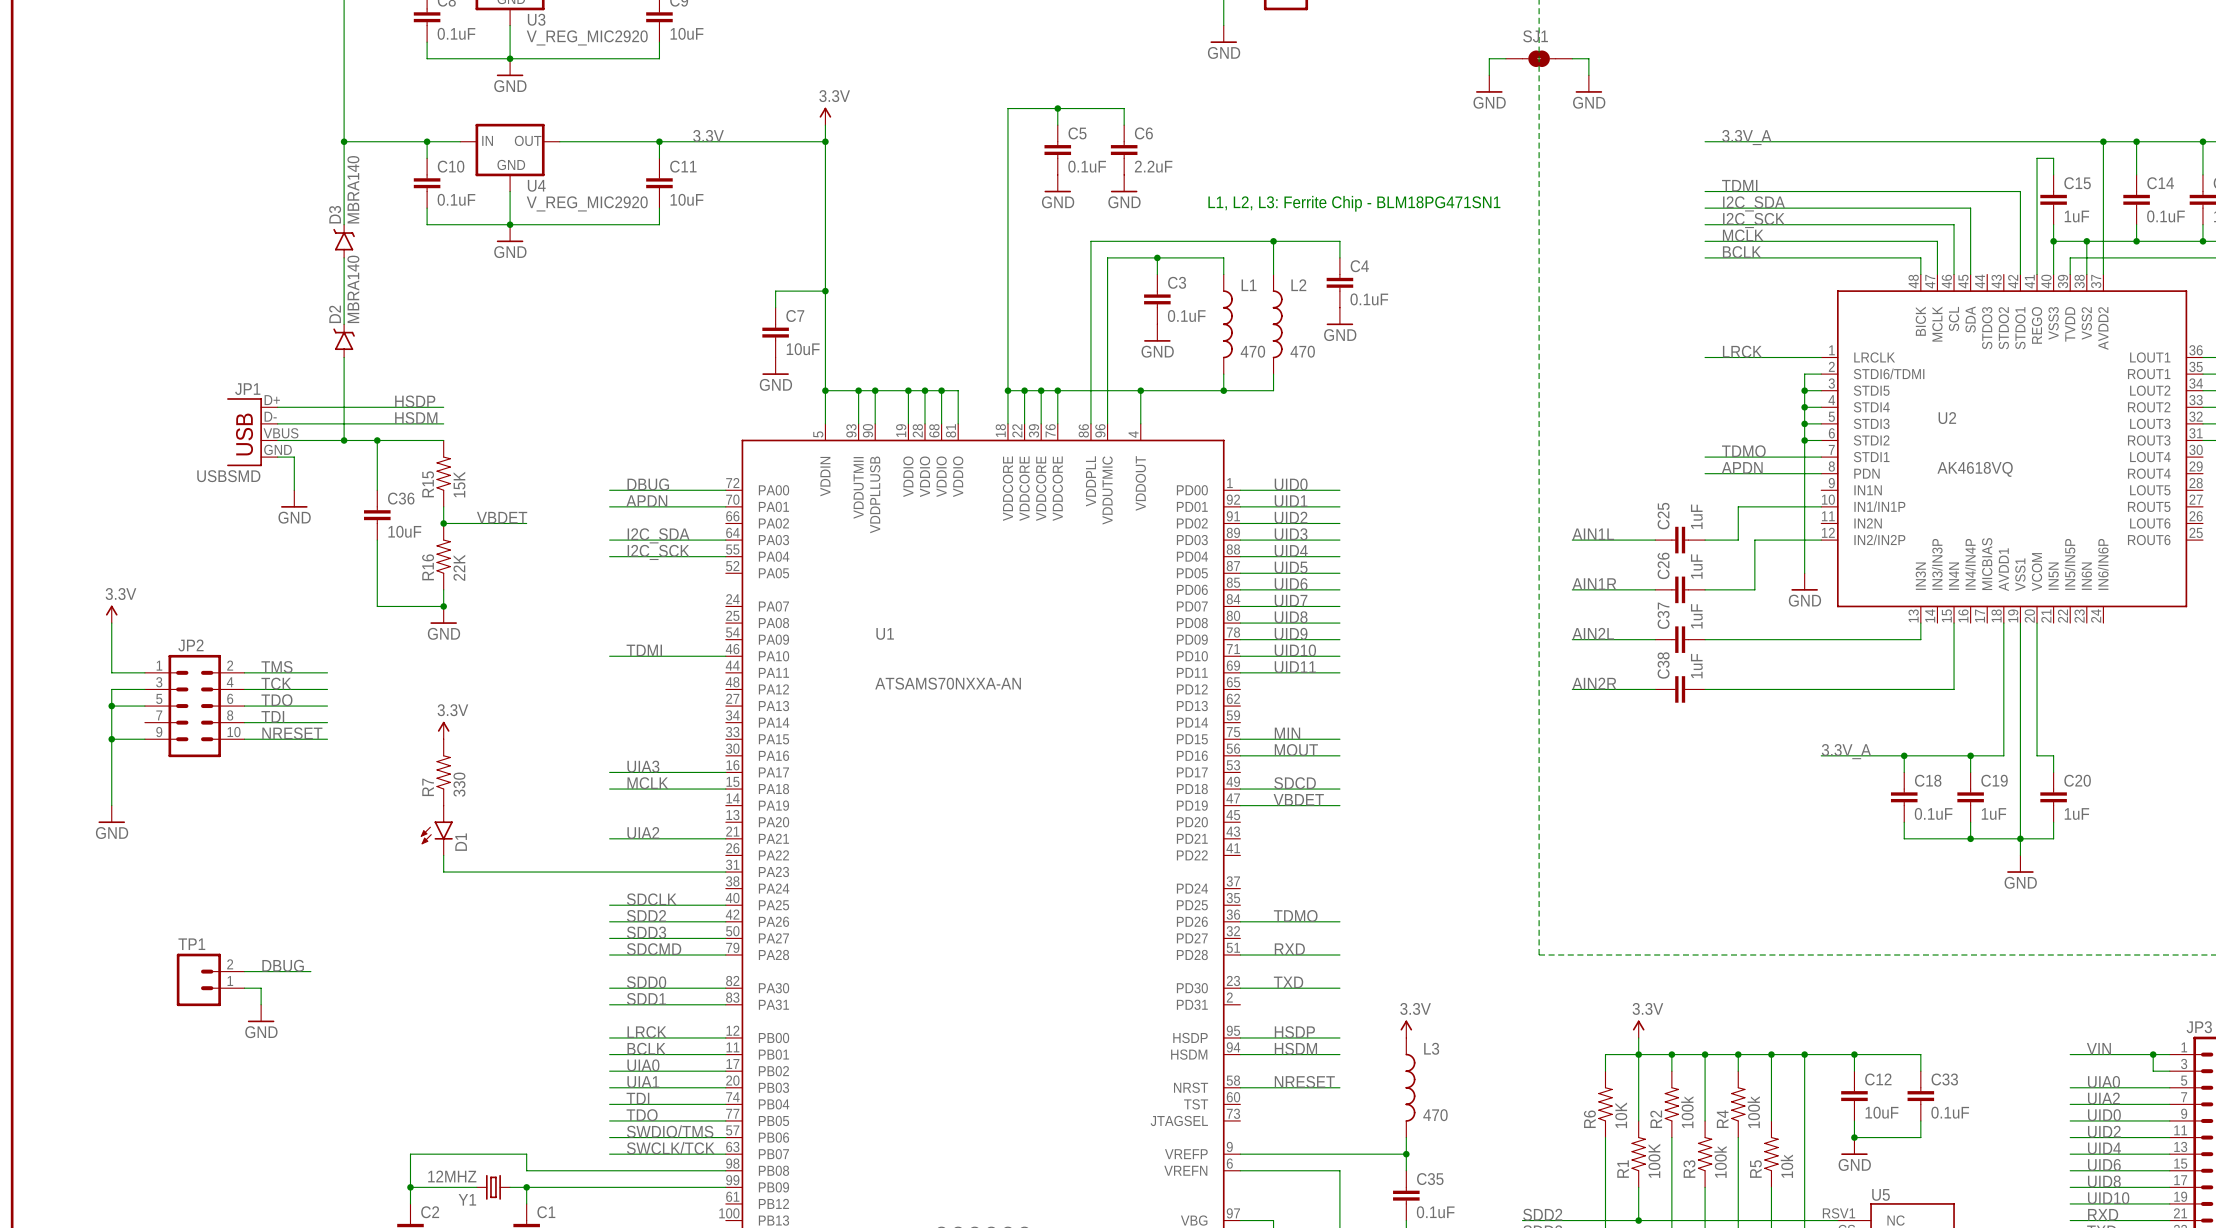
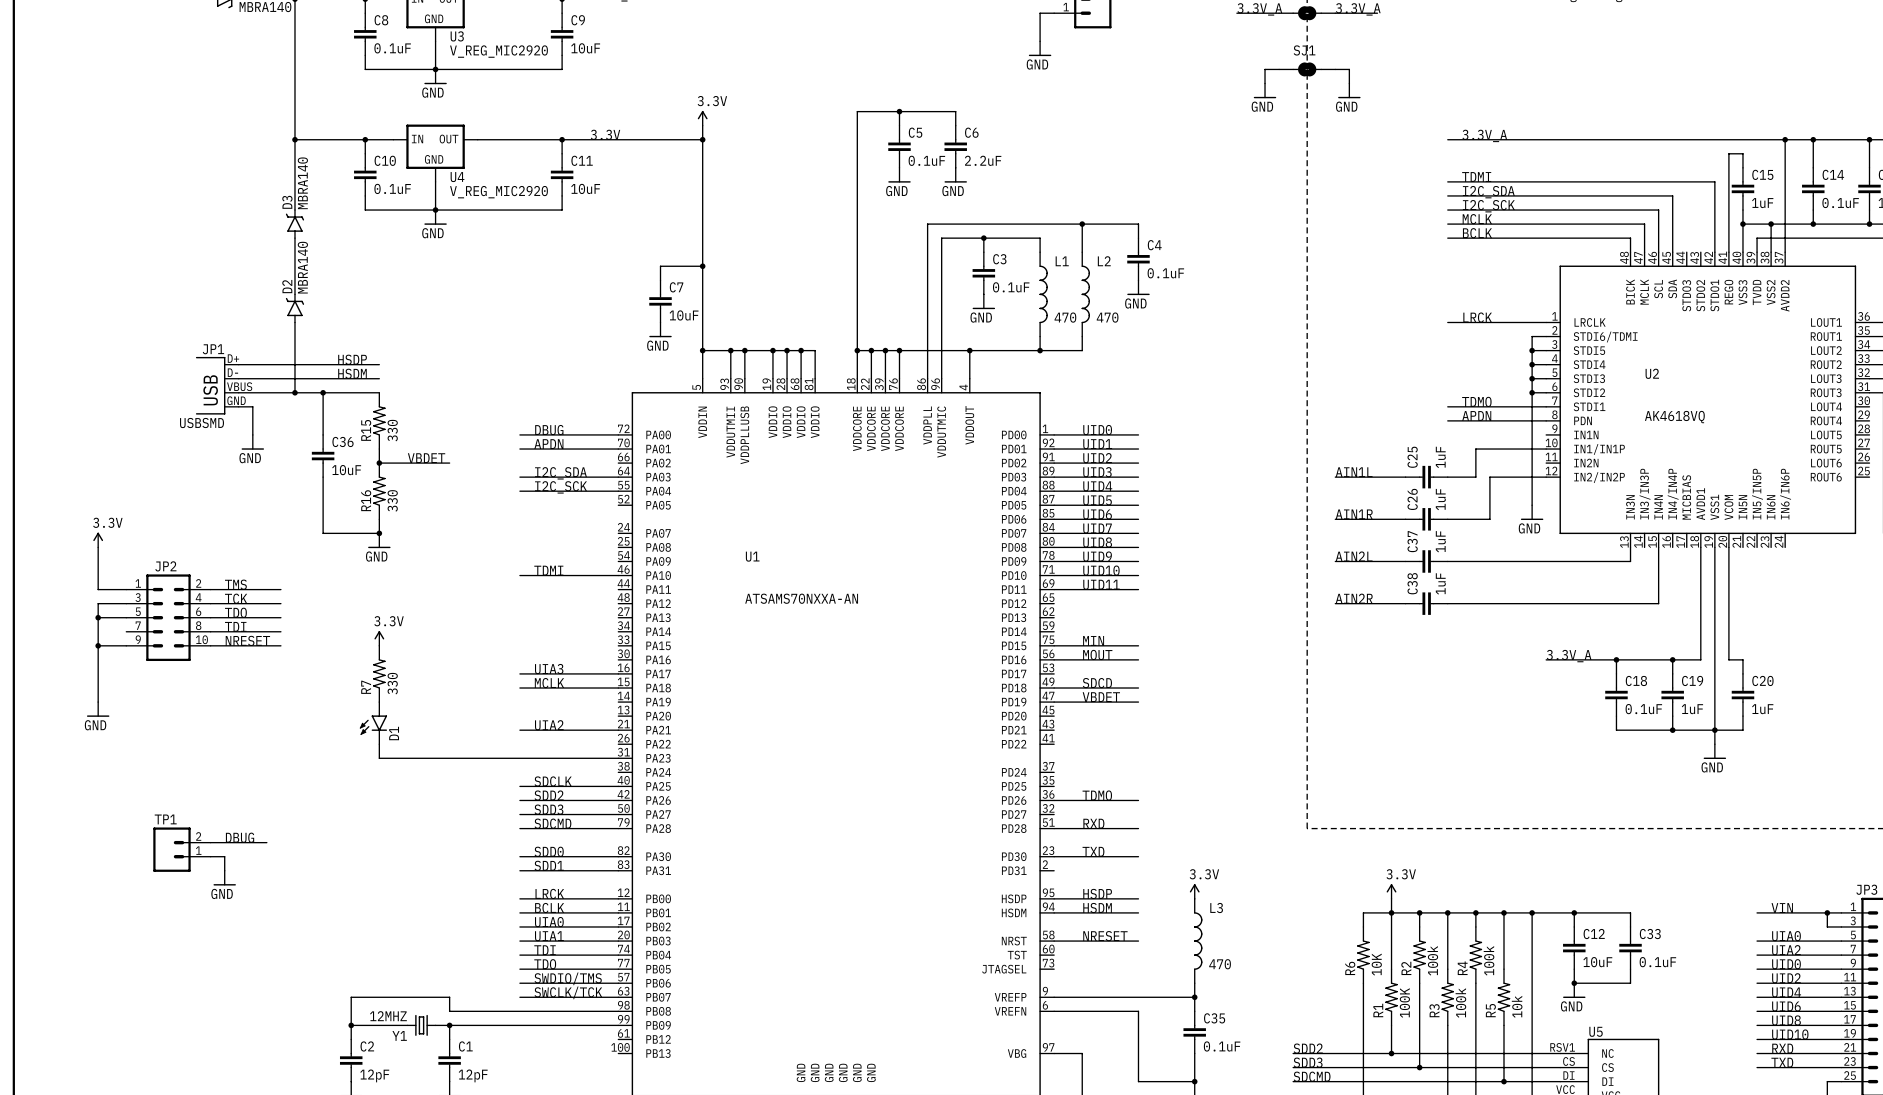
text: L1, L2, L3: Ferrite Chip - BLM18PG471SN1 (1354, 203) -> none
R15 value: 15K (459, 484) -> 330 (392, 430)
R16 value: 22K (459, 567) -> 330 (392, 500)

